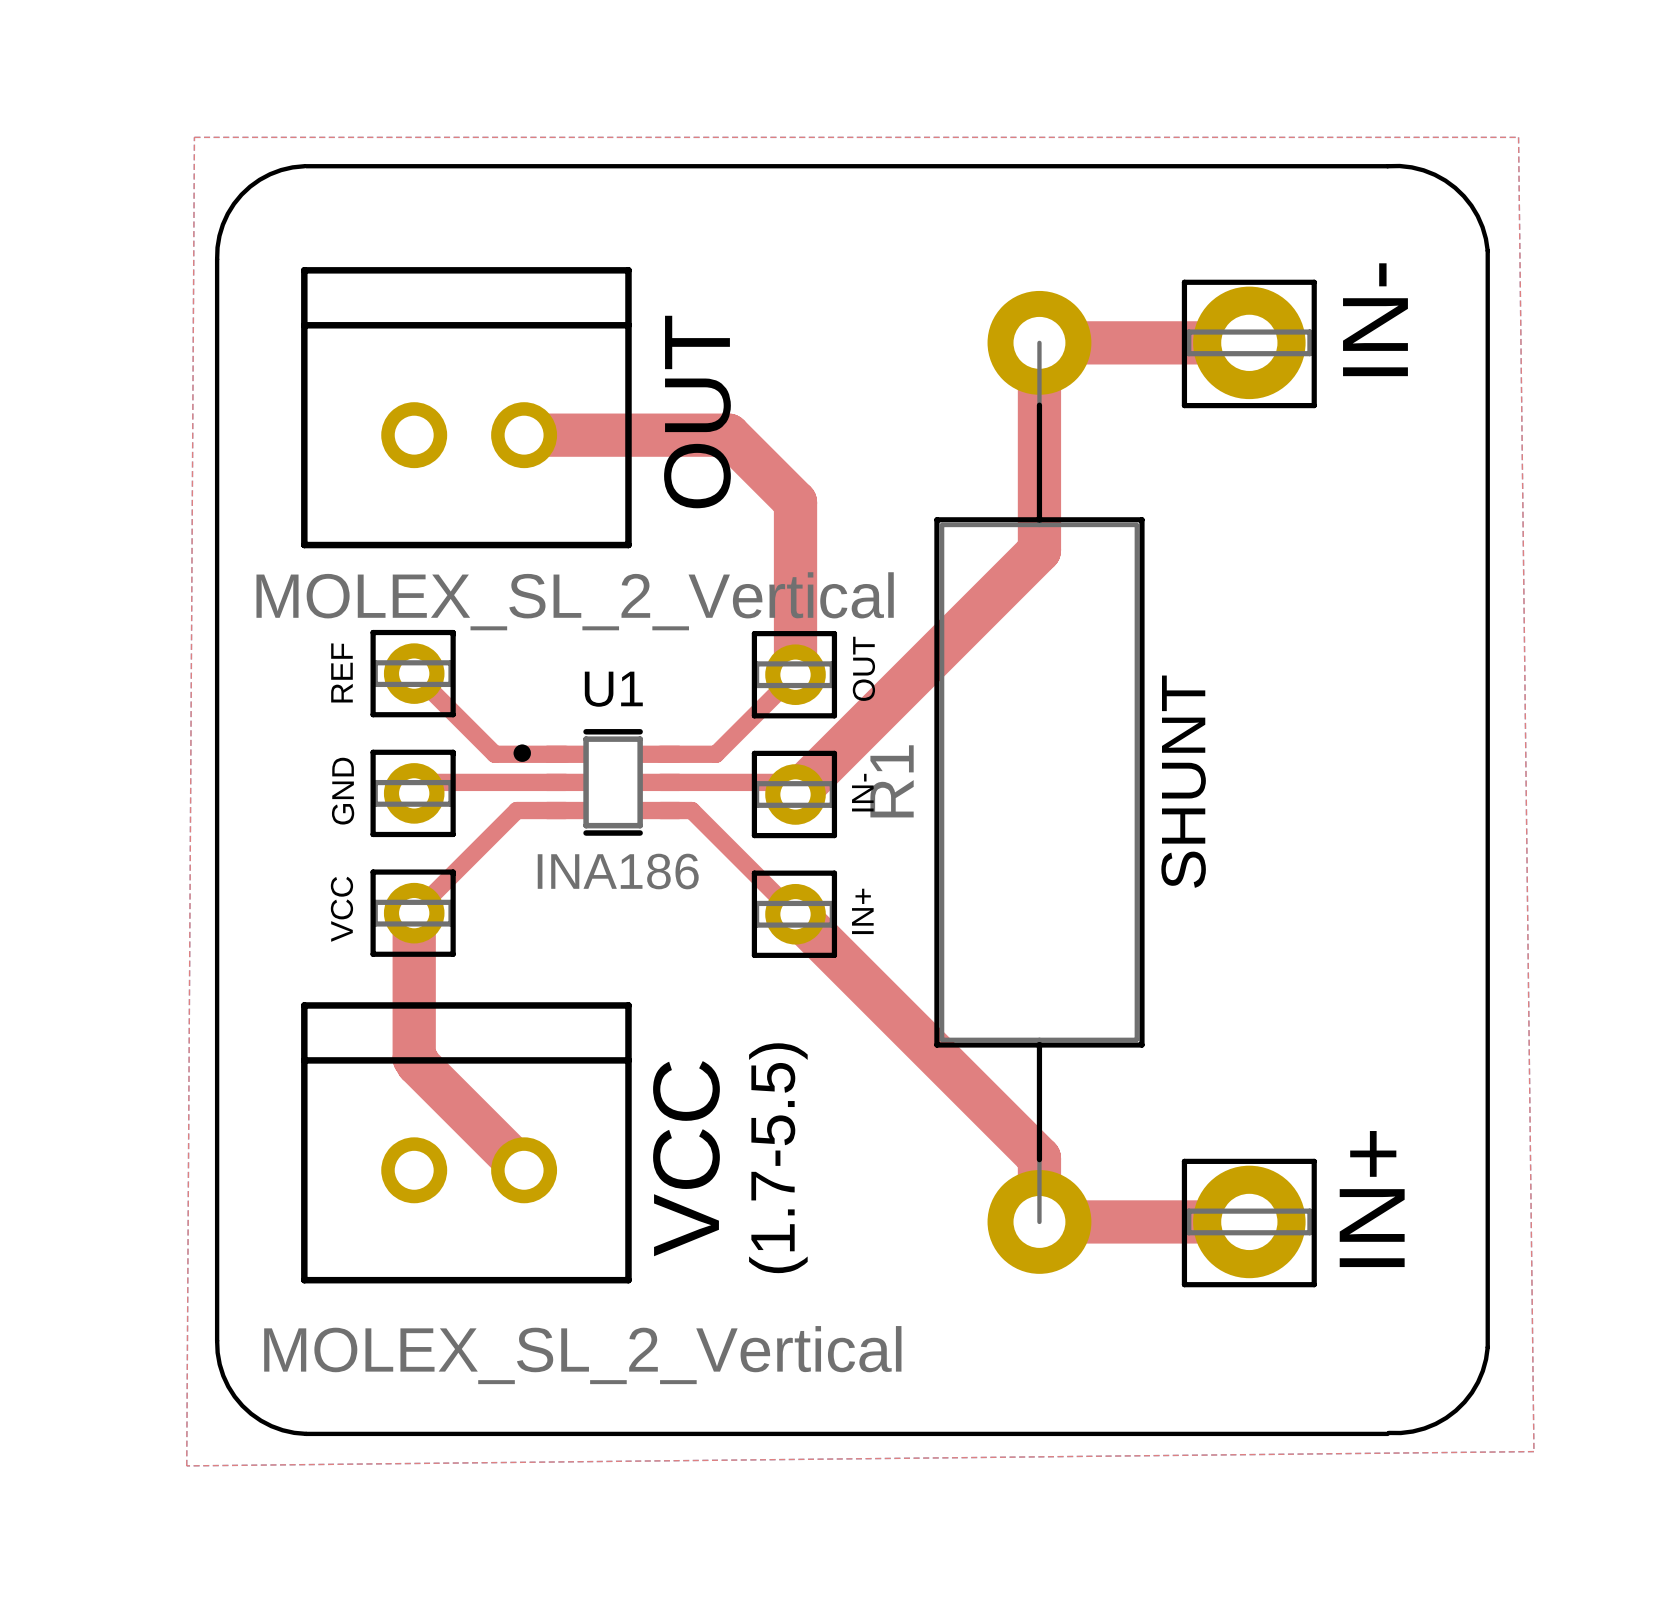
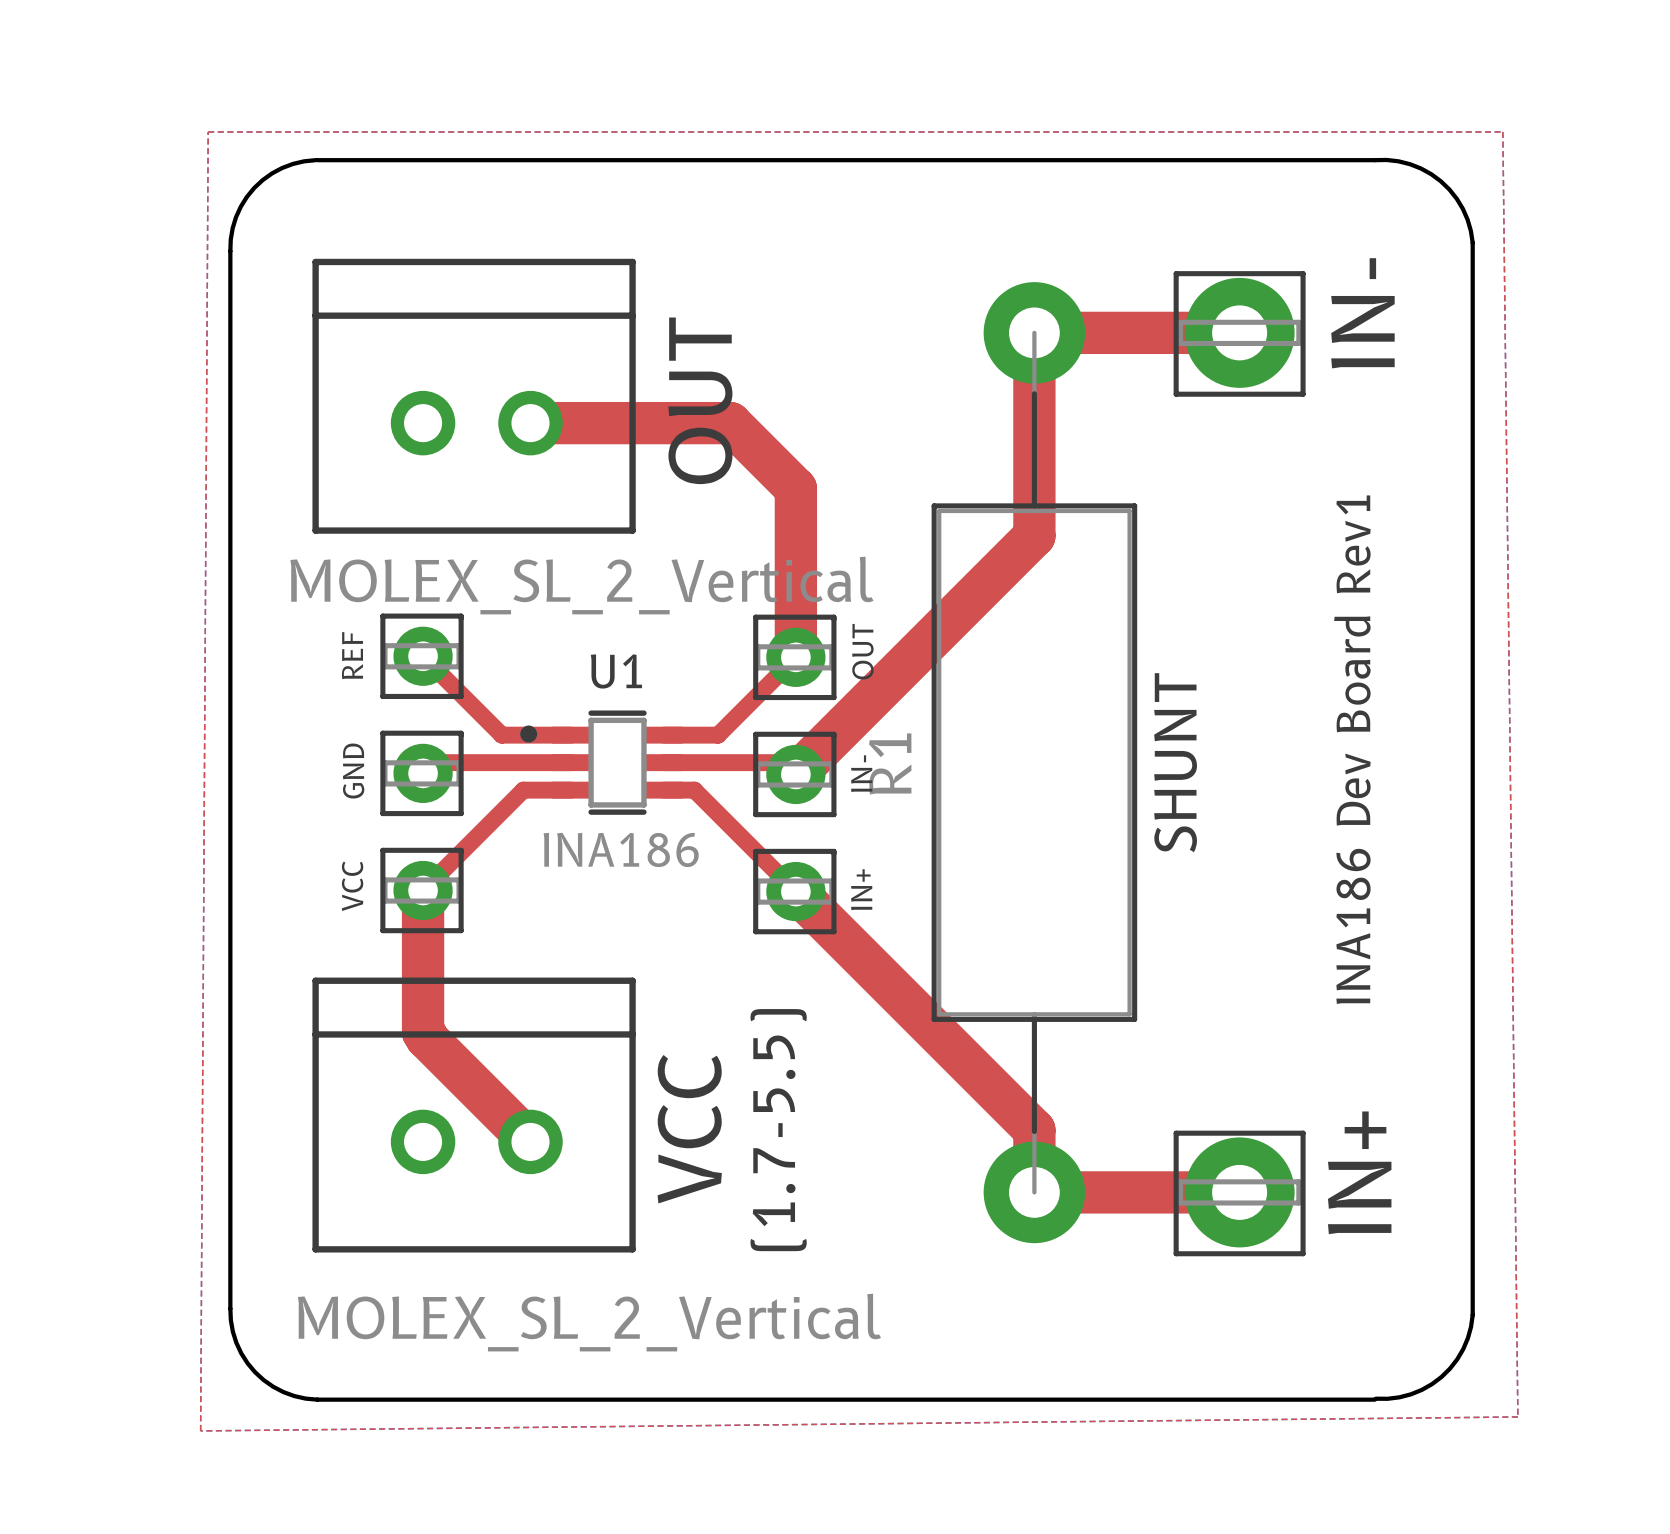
text: none -> INA186 Dev Board Rev1 (1352, 749)

